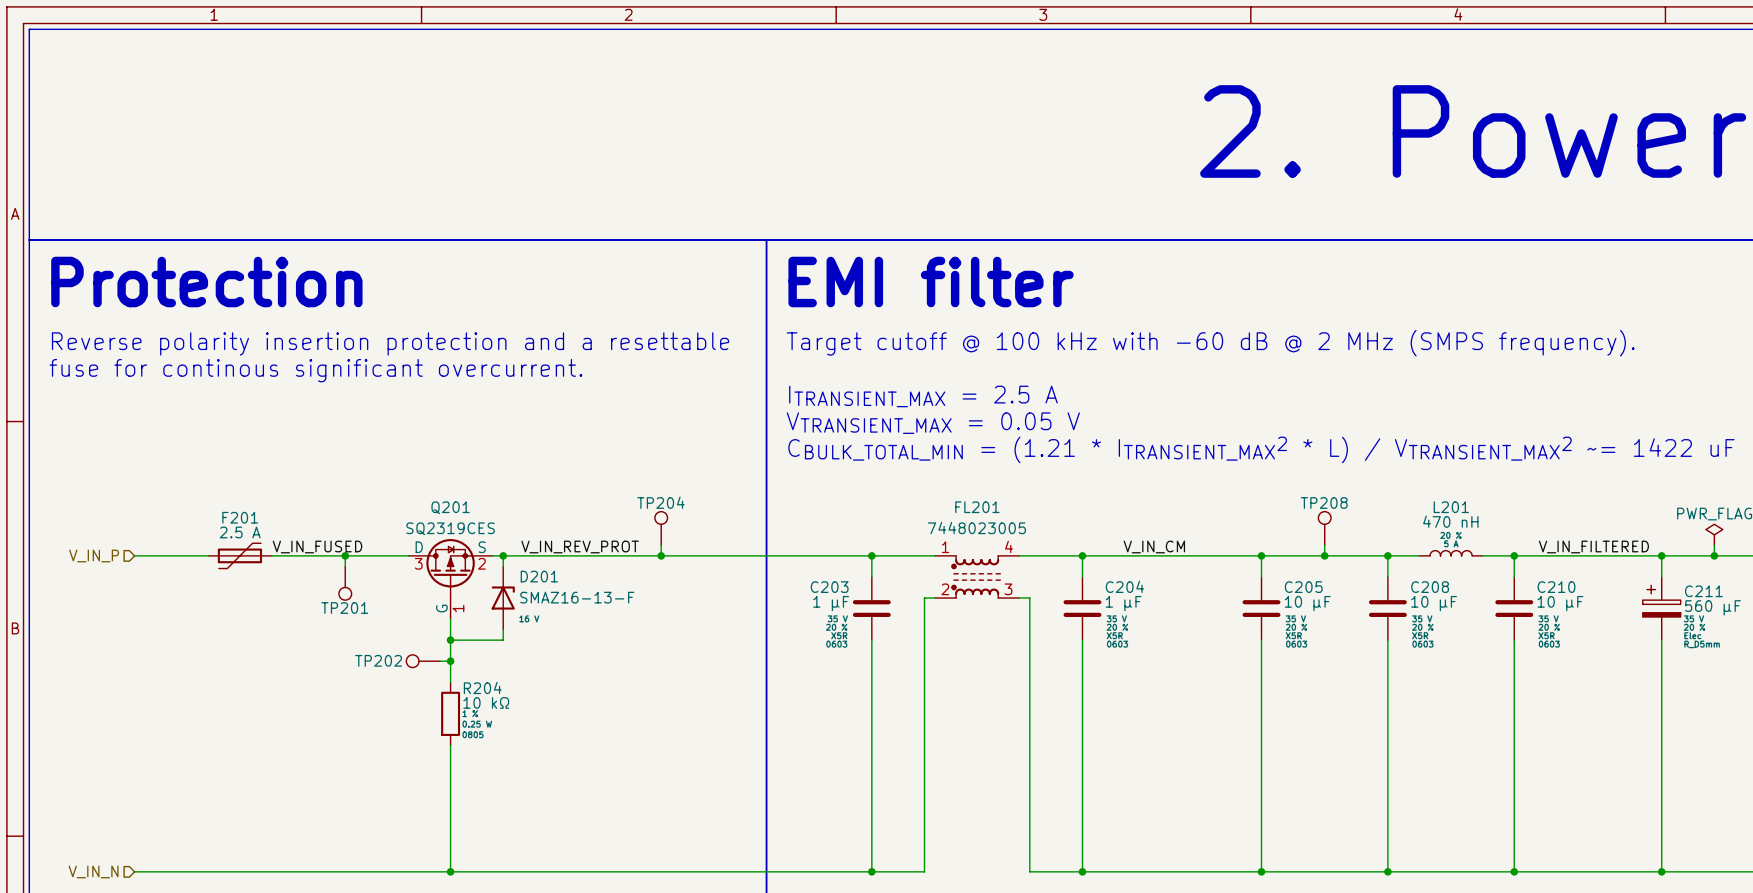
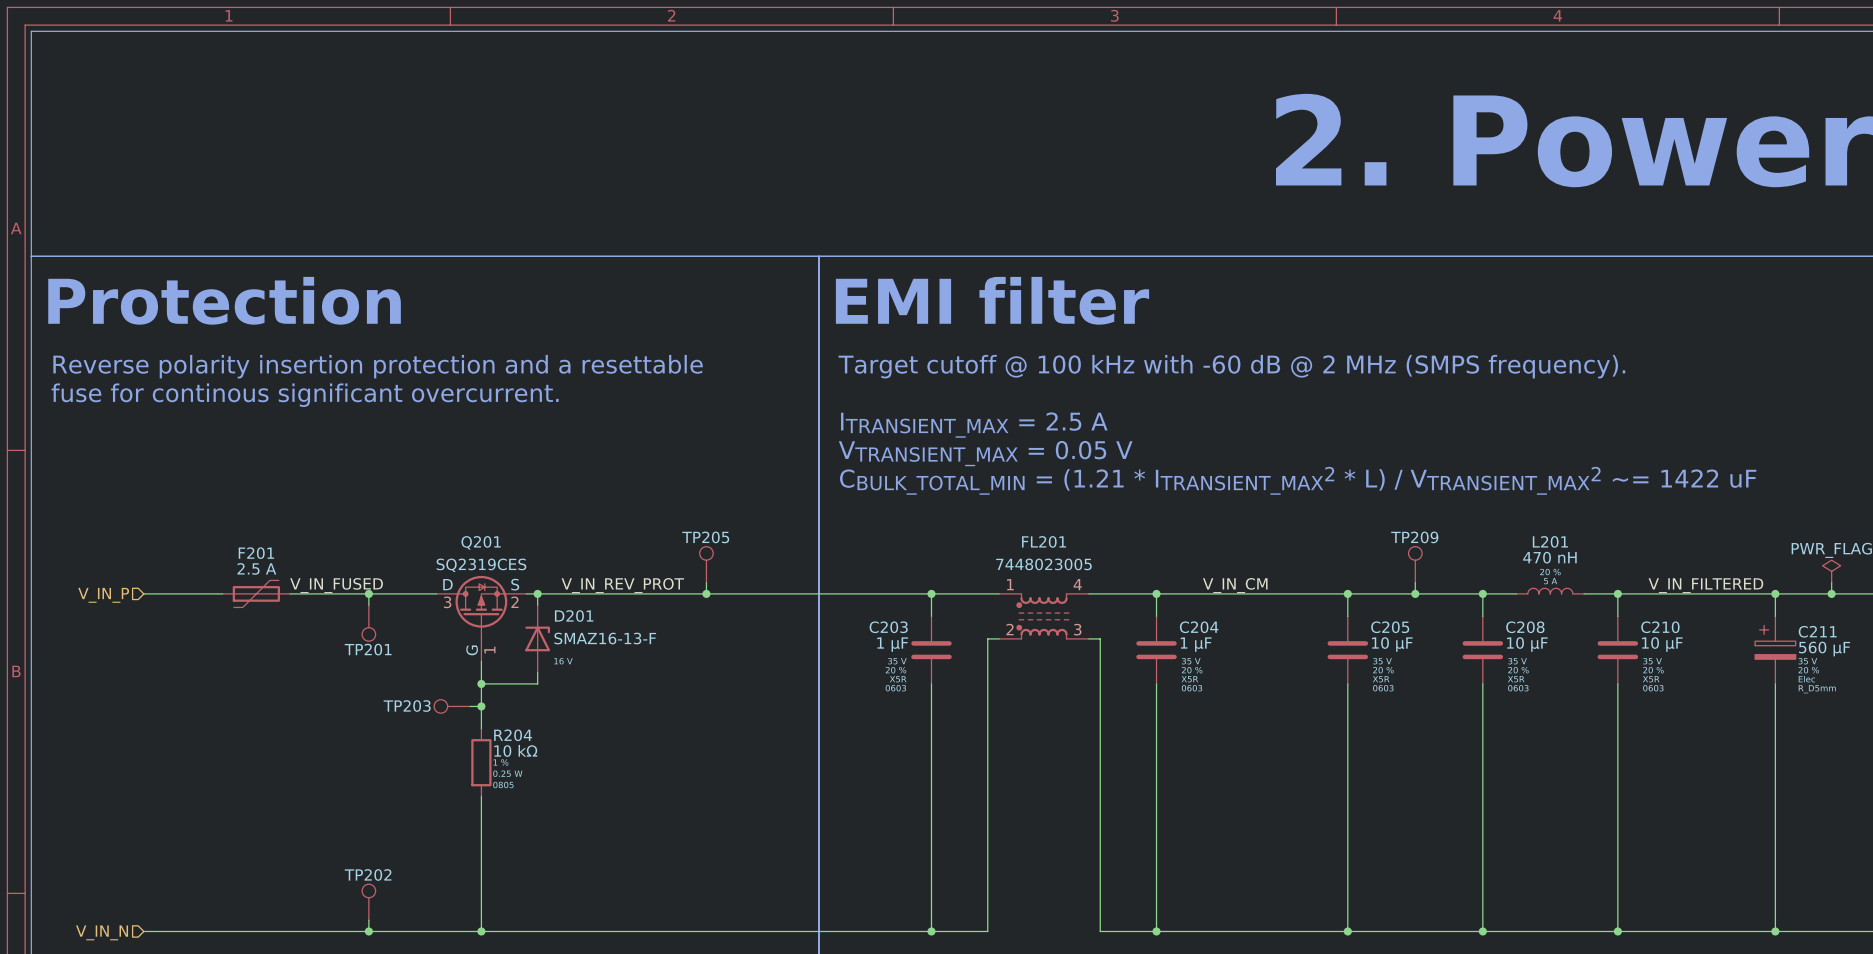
TP204 name: TP204 (660, 502) -> TP205 (705, 537)
TP208 name: TP208 (1324, 503) -> TP209 (1414, 537)
TP202 name: TP202 (378, 660) -> TP203 (407, 706)
TP202: none -> (368, 902)
wire: none -> (368, 920) (368, 931)
junction: none -> (368, 931)

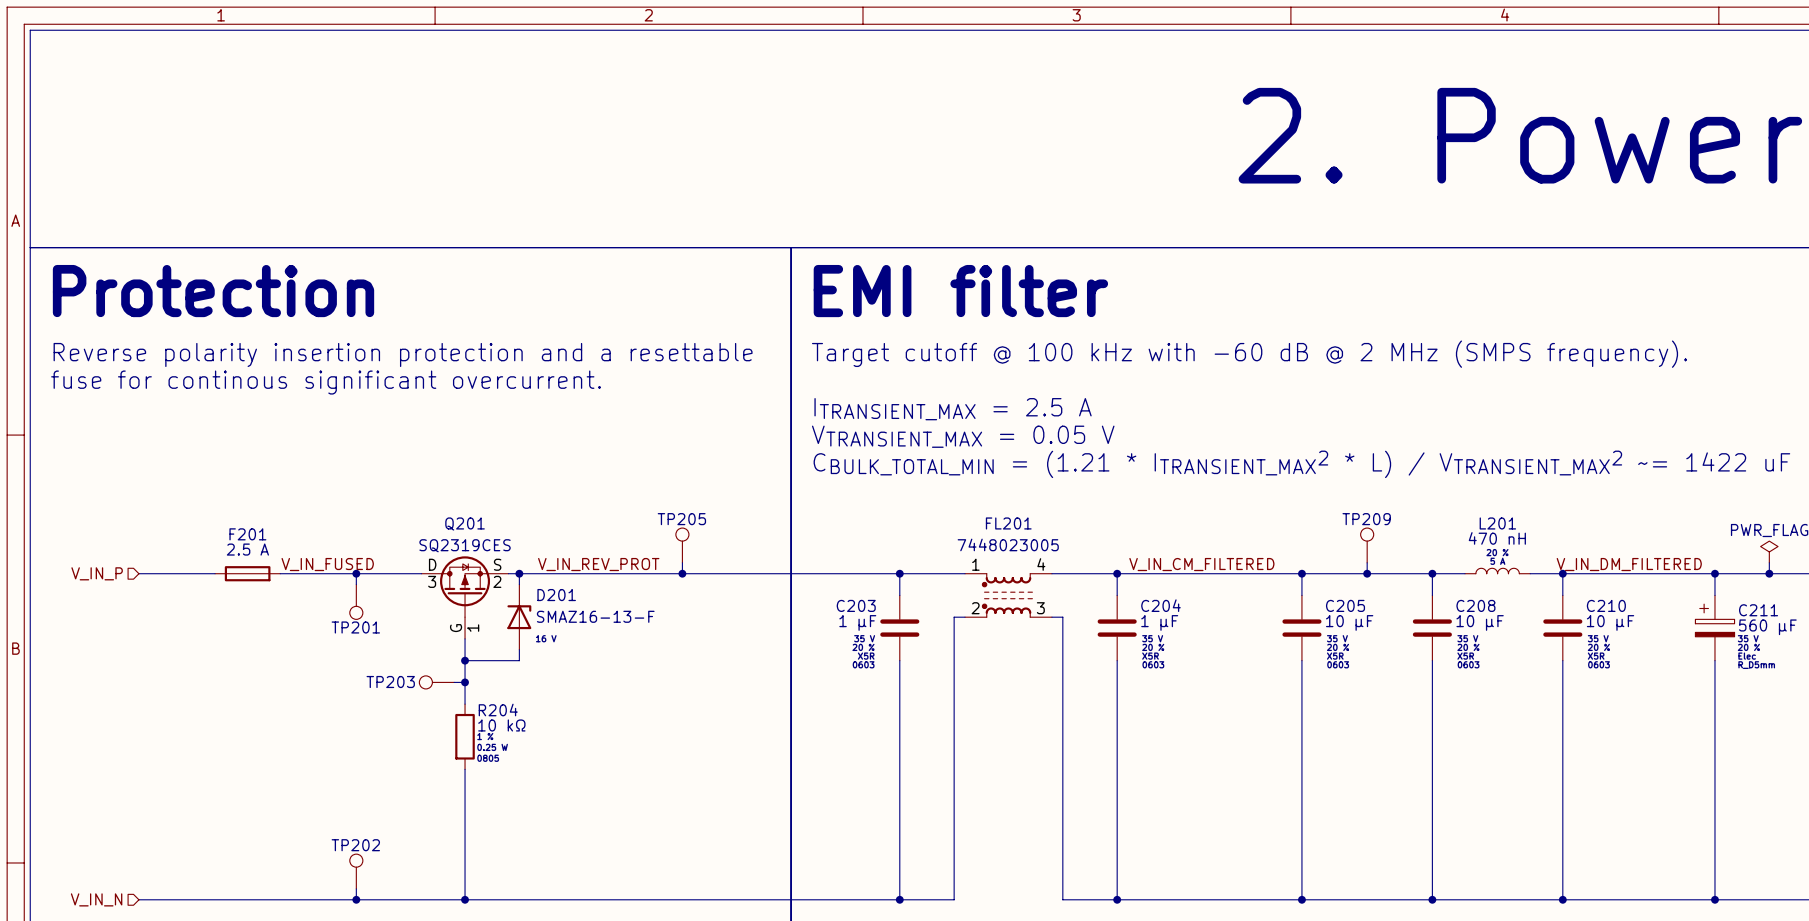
F201 symbol: [222, 580, 291, 608] -> [215, 566, 281, 582]
label: V_IN_CM (1235, 585) -> V_IN_CM_FILTERED (1201, 564)
label: V_IN_FILTERED (1705, 585) -> V_IN_DM_FILTERED (1629, 564)

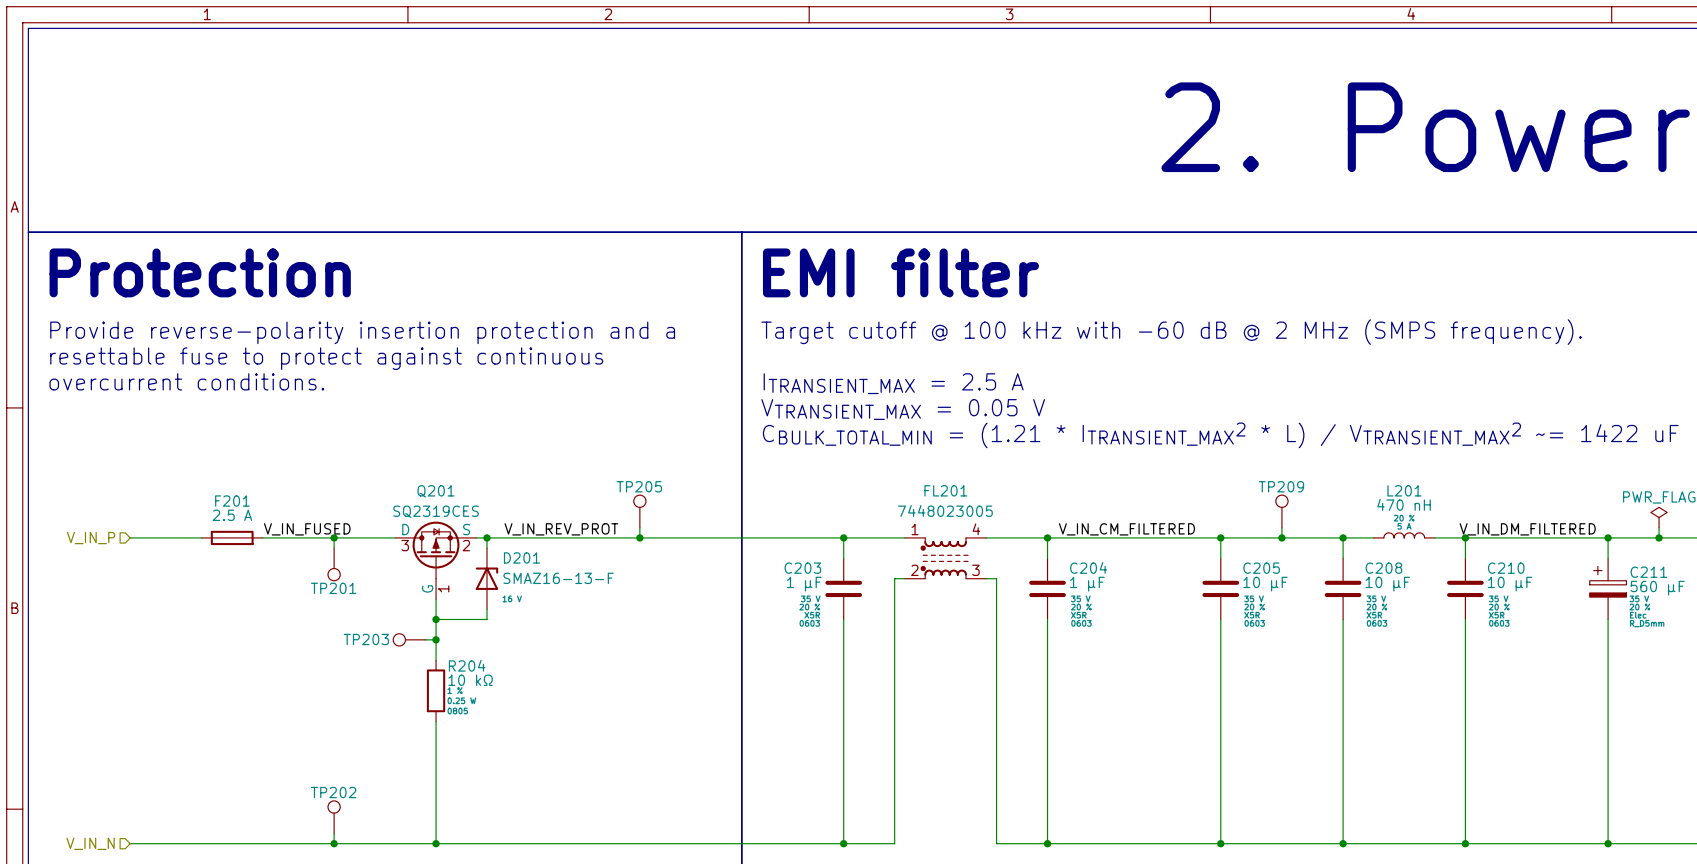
text: Reverse polarity insertion protection and a resettable (403, 354) -> Provide reverse-polarity insertion protection and a (362, 332)
text: fuse for continous significant overcurrent. (326, 382) -> resettable fuse to protect against continuous (326, 358)
text: none -> overcurrent conditions. (186, 381)

